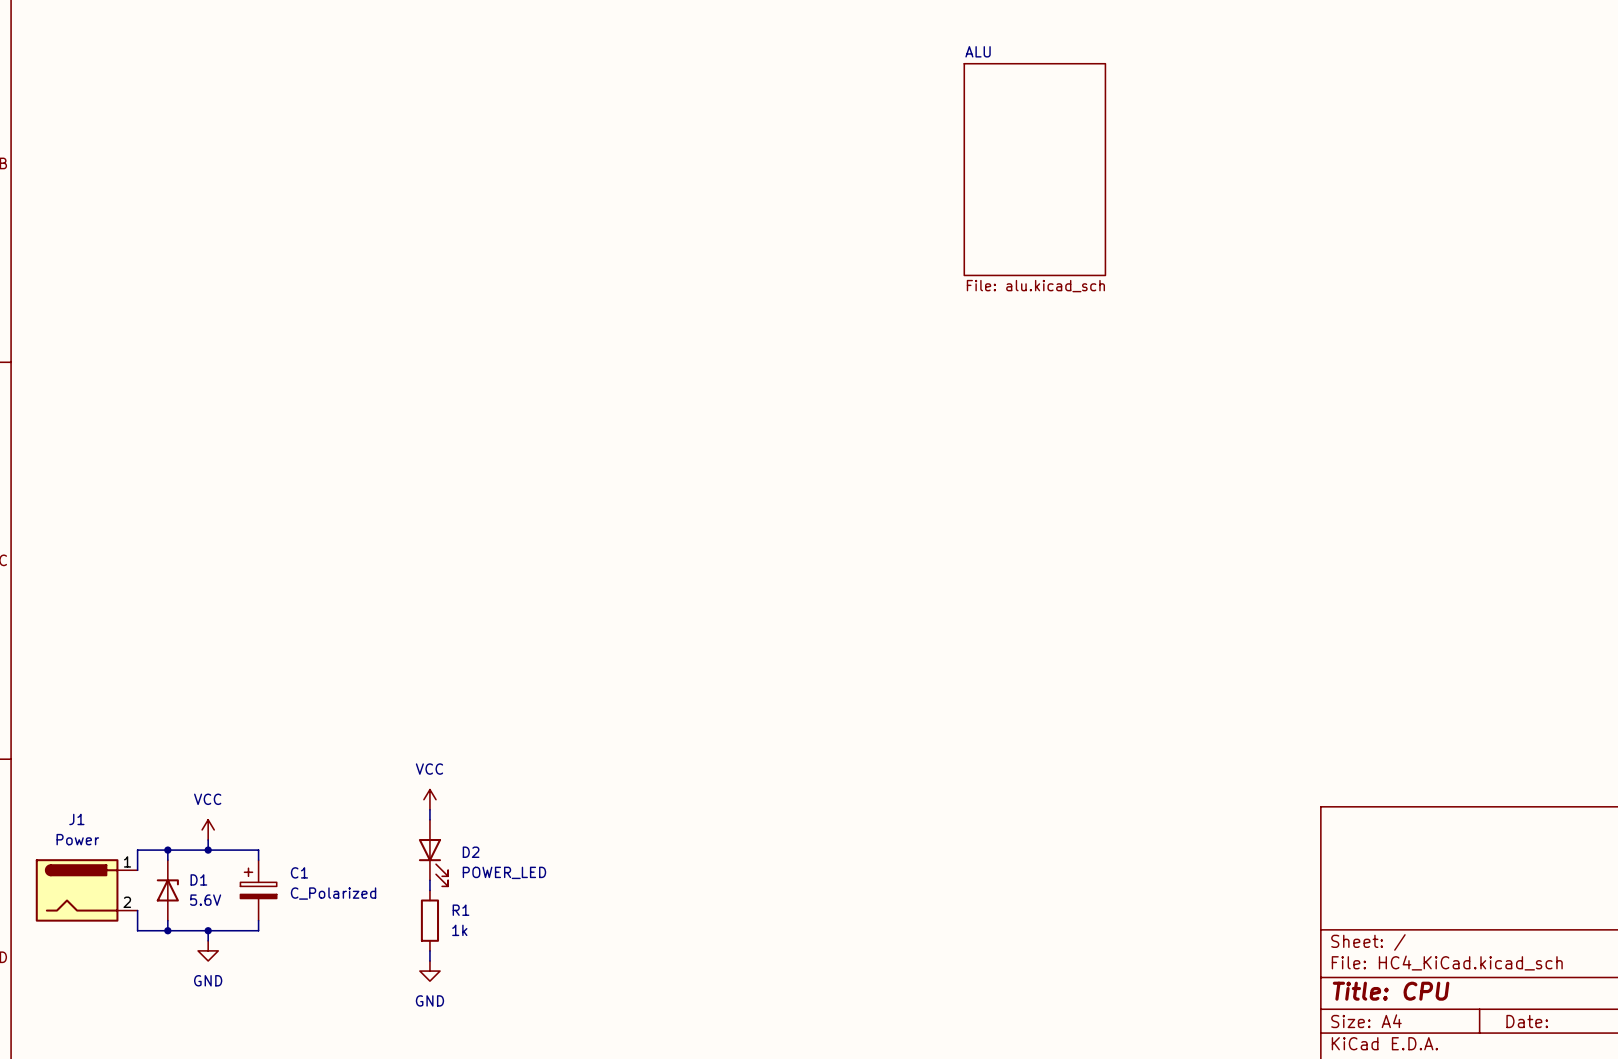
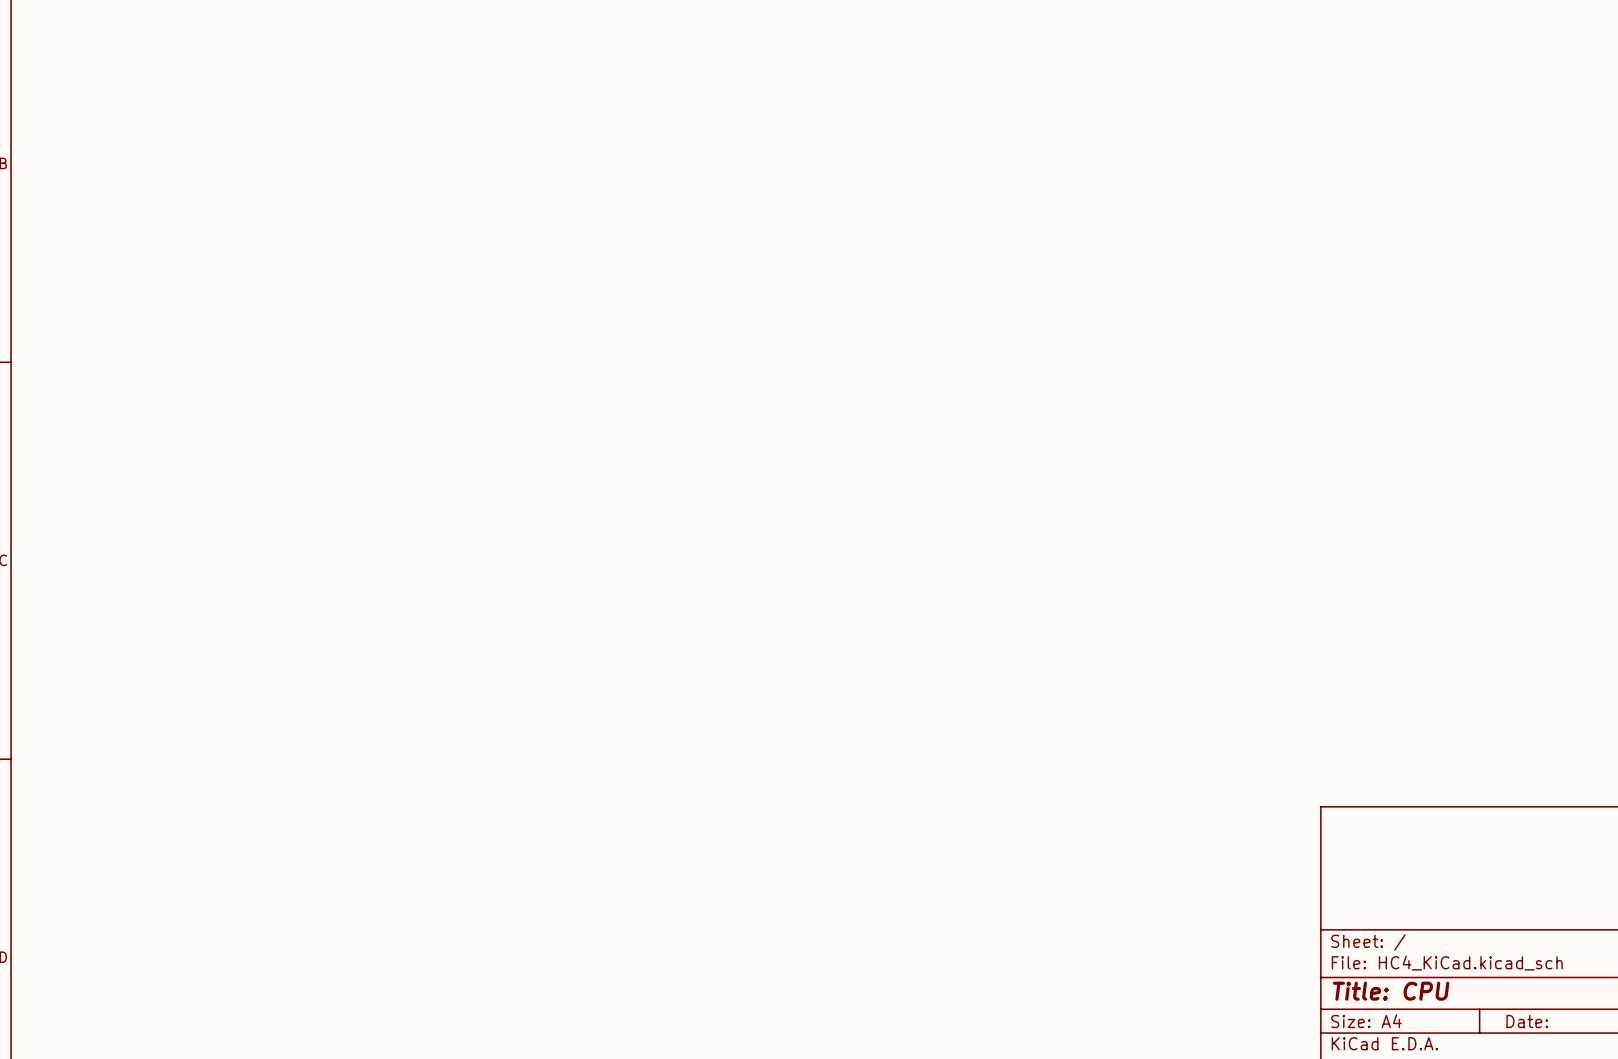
sheet ALU: File: alu.kicad_sch (1034, 169) -> none
power symbol: VCC (429, 799) -> none
wire: (429, 809) (429, 819) -> none
power symbol: VCC (208, 829) -> none
wire: (208, 840) (208, 850) -> none
wire: (167, 850) (167, 860) -> none
junction: (167, 850) -> none
junction: (208, 850) -> none
D2: POWER_LED (433, 853) -> none
wire: (258, 860) (258, 850) (137, 850) (137, 870) -> none
wire: (429, 880) (429, 890) -> none
J1: Power (86, 890) -> none
D1: 5.6V (167, 890) -> none
C1: C_Polarized (258, 890) -> none
wire: (137, 910) (137, 930) (258, 930) (258, 920) -> none
wire: (167, 920) (167, 930) -> none
R1: 1k (429, 920) -> none
junction: (167, 930) -> none
wire: (208, 930) (208, 940) -> none
junction: (208, 930) -> none
power symbol: GND (208, 950) -> none
wire: (429, 950) (429, 960) -> none
power symbol: GND (429, 971) -> none

